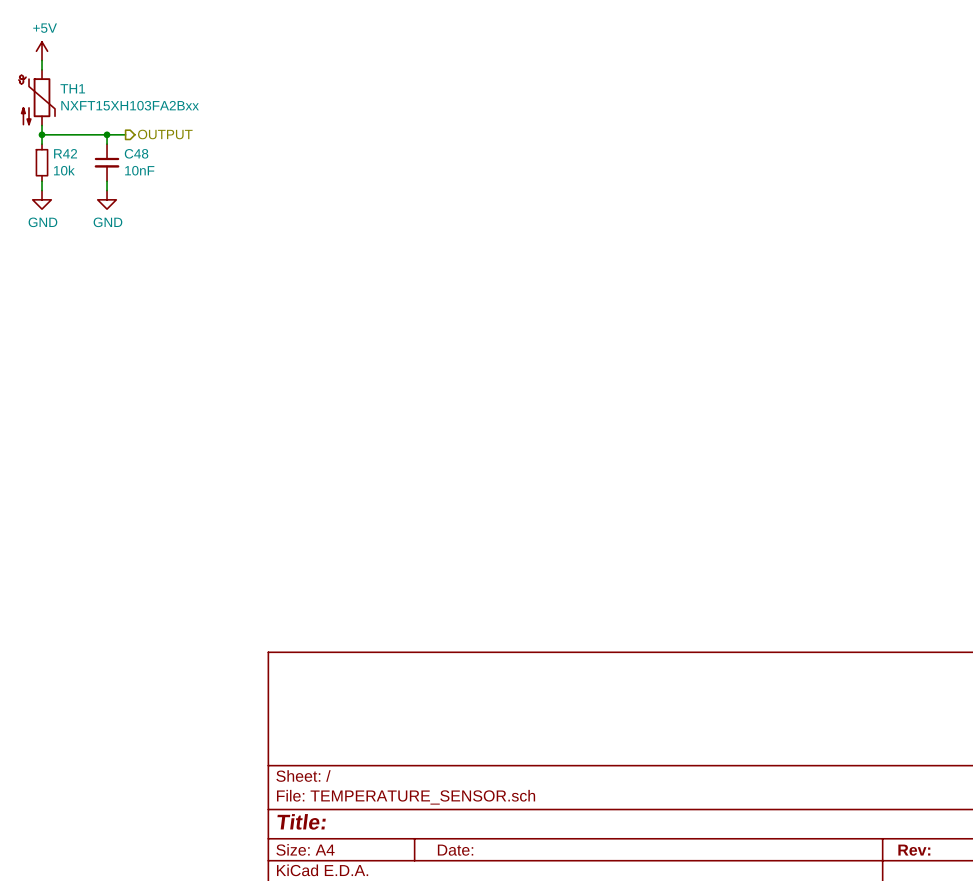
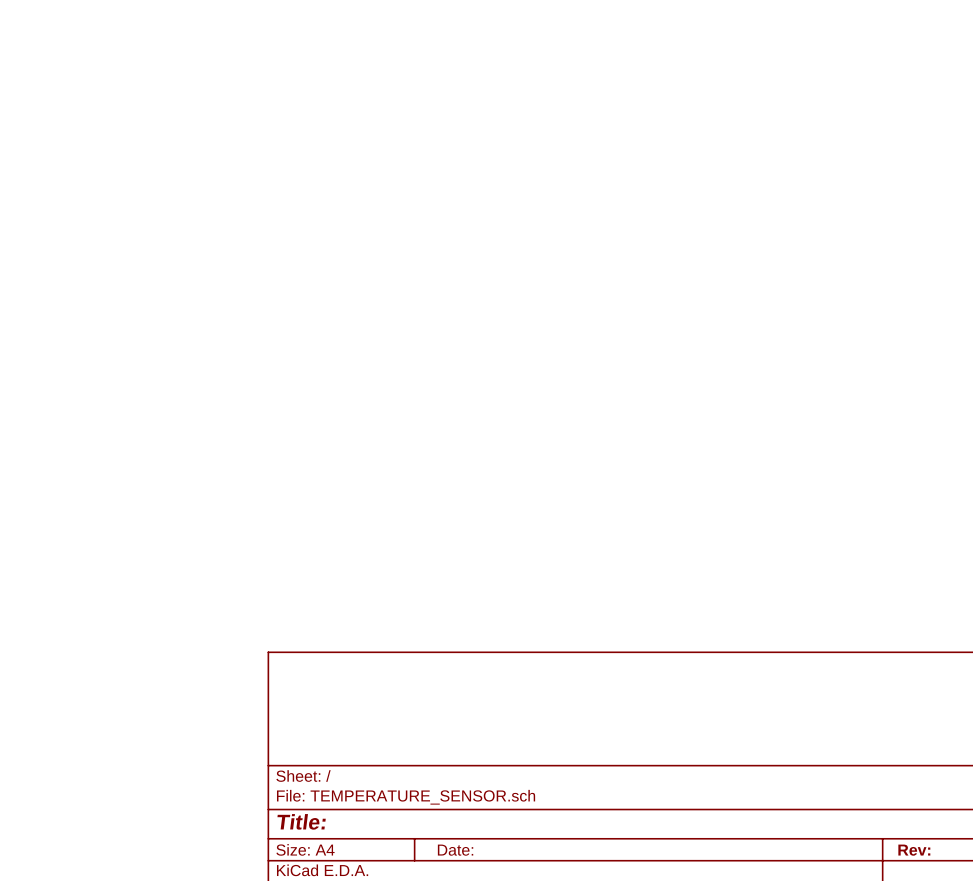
power symbol: +5V (42, 51) -> none
wire: (42, 60) (42, 69) -> none
TH1: NXFT15XH103FA2Bxx (36, 97) -> none
wire: (42, 125) (42, 144) -> none
wire: (42, 134) (125, 134) -> none
junction: (42, 134) -> none
wire: (107, 134) (107, 144) -> none
junction: (107, 134) -> none
hierarchical label: OUTPUT (165, 134) -> none
R42: 10k (42, 162) -> none
C48: 10nF (107, 162) -> none
wire: (42, 181) (42, 190) -> none
wire: (107, 181) (107, 190) -> none
power symbol: GND (42, 199) -> none
power symbol: GND (107, 199) -> none

